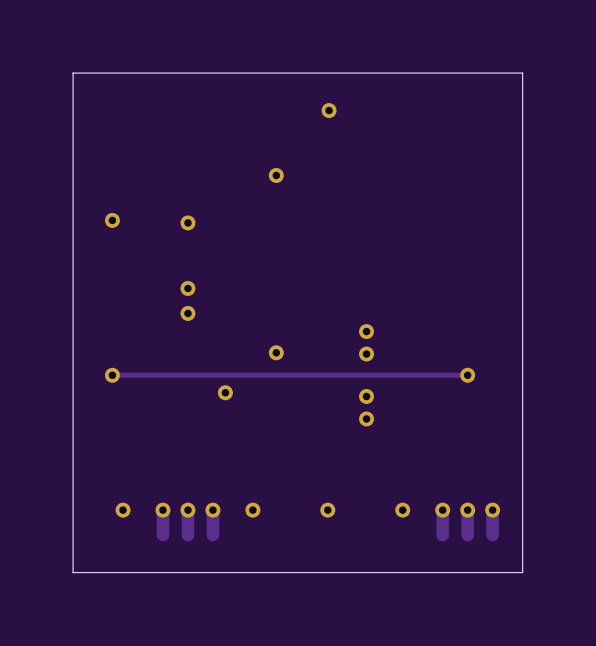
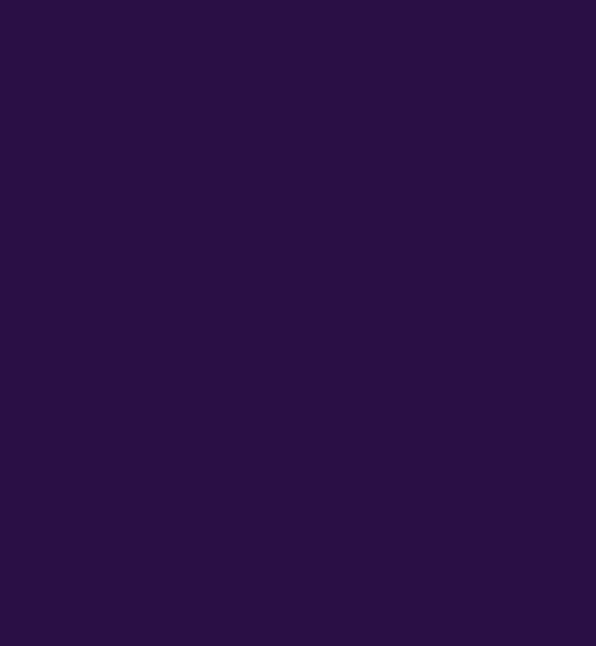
board edge: (522, 73) (73, 73) (73, 572) (522, 572) (522, 73) -> none
via: (329, 110) -> none
via: (276, 175) -> none
via: (112, 220) -> none
via: (187, 222) -> none
via: (187, 288) -> none
via: (187, 313) -> none
via: (366, 331) -> none
via: (276, 352) -> none
via: (366, 354) -> none
via: (112, 375) -> none
track: (467, 375) (112, 375) -> none
via: (467, 375) -> none
via: (225, 392) -> none
via: (366, 396) -> none
via: (366, 418) -> none
via: (123, 510) -> none
track: (162, 510) (162, 535) -> none
via: (162, 510) -> none
track: (187, 510) (187, 535) -> none
via: (187, 510) -> none
track: (212, 510) (212, 535) -> none
via: (212, 510) -> none
via: (252, 510) -> none
via: (327, 510) -> none
via: (402, 510) -> none
track: (442, 510) (442, 535) -> none
via: (442, 510) -> none
track: (467, 510) (467, 535) -> none
via: (467, 510) -> none
track: (492, 510) (492, 535) -> none
via: (492, 510) -> none

